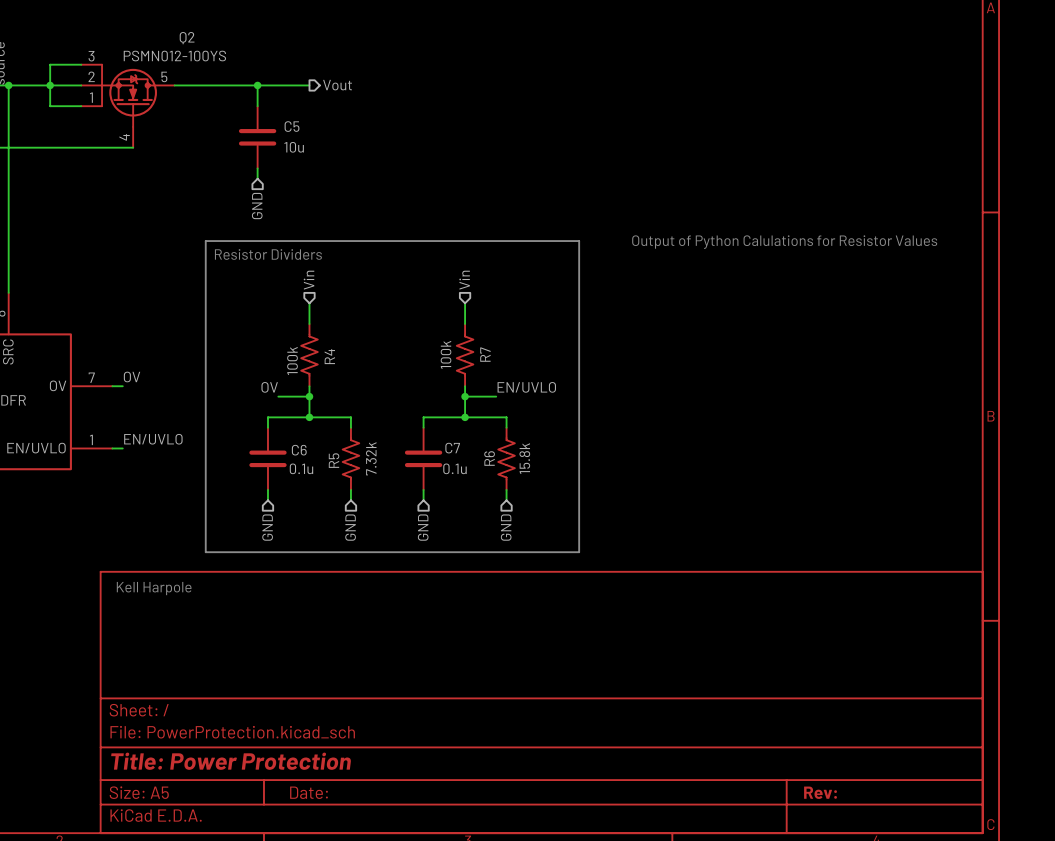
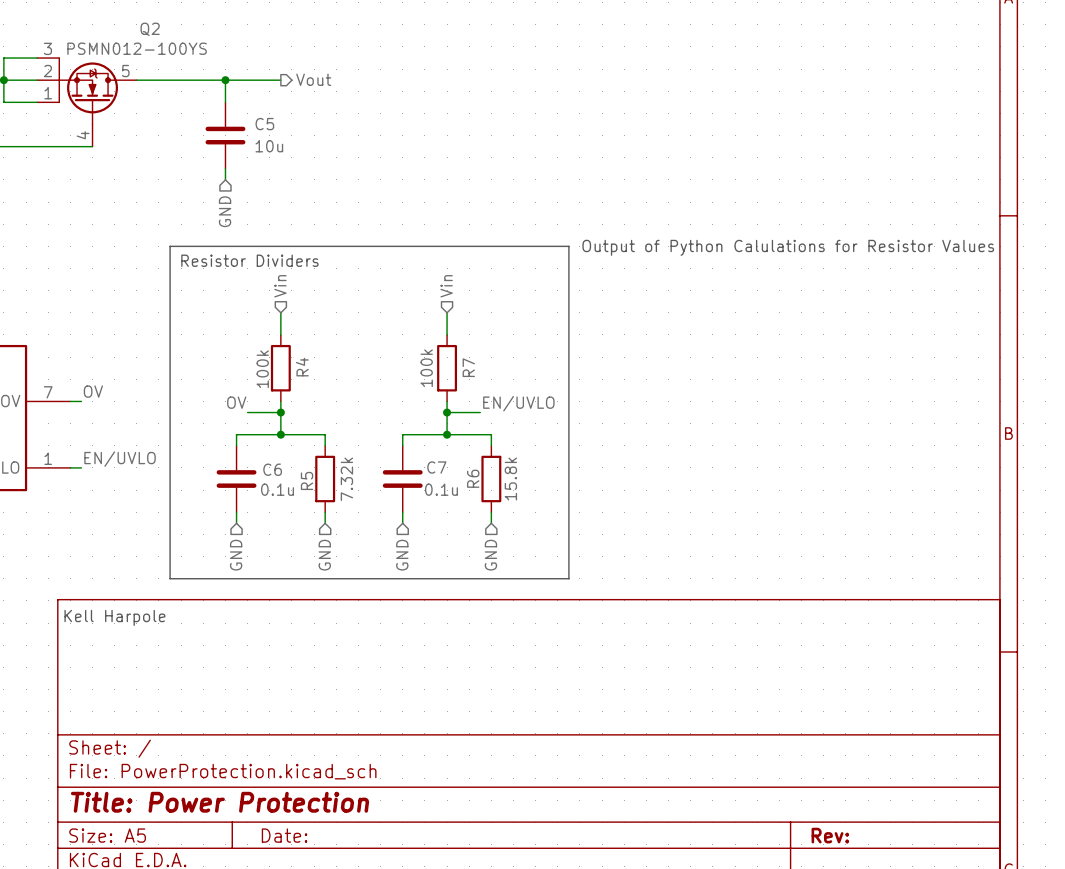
R4 symbol: [301, 324, 318, 387] -> [270, 334, 291, 402]
R7 symbol: [456, 324, 474, 387] -> [437, 334, 458, 402]
R5 symbol: [342, 427, 360, 490] -> [315, 445, 336, 513]
R6 symbol: [498, 427, 515, 490] -> [481, 445, 502, 513]

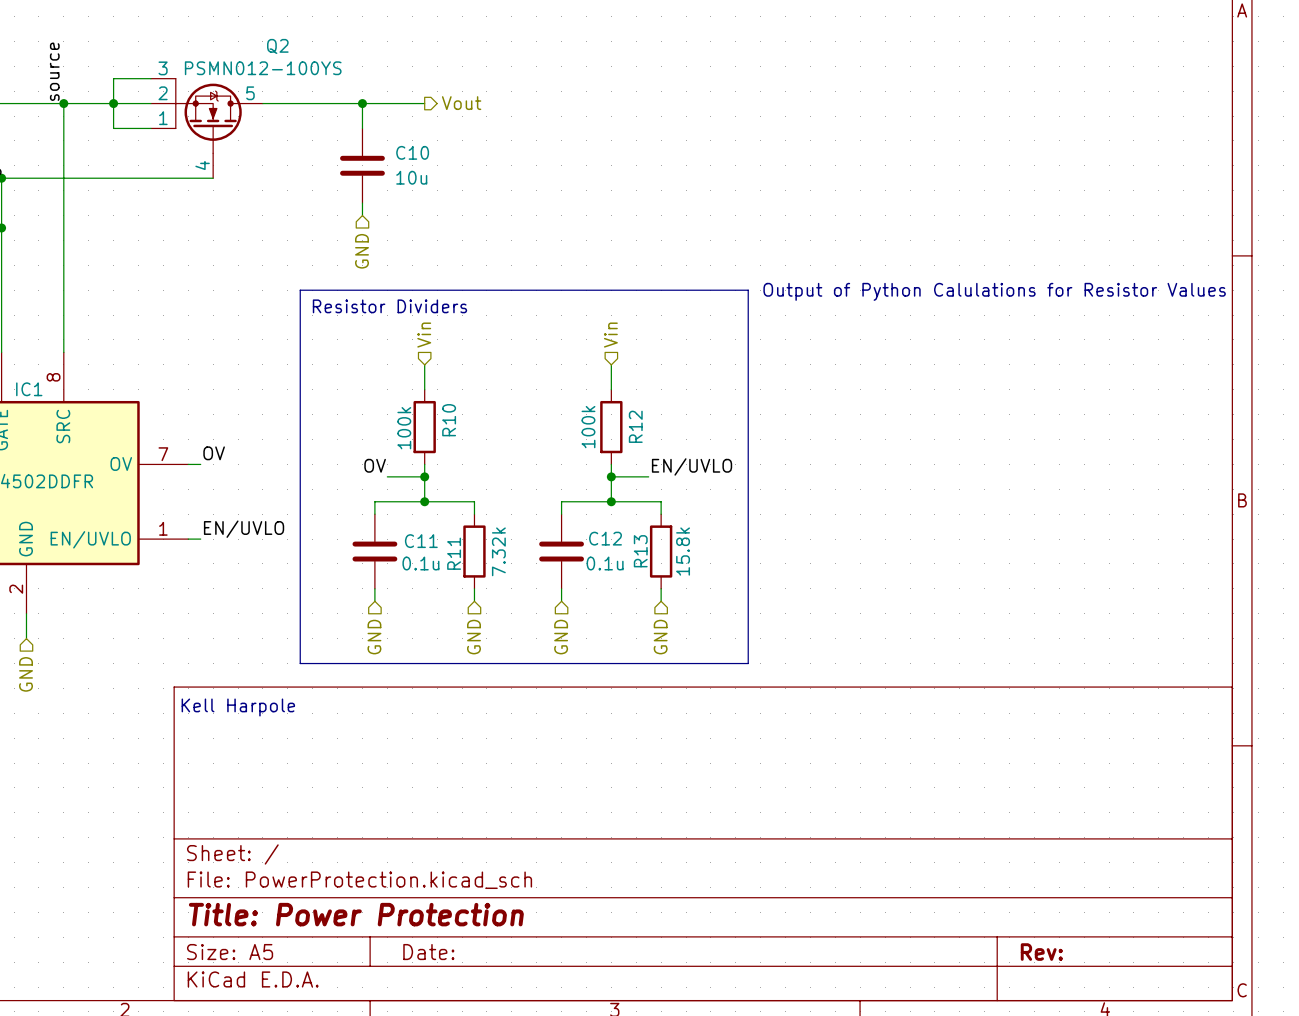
C5 name: C5 (264, 124) -> C10 (412, 152)
R4 name: R4 (302, 367) -> R10 (449, 420)
R7 name: R7 (468, 367) -> R12 (635, 426)
C7 name: C7 (436, 467) -> C12 (605, 538)
C6 name: C6 (272, 469) -> C11 (421, 541)
R6 name: R6 (473, 478) -> R13 (640, 551)
R5 name: R5 (307, 480) -> R11 (454, 553)

